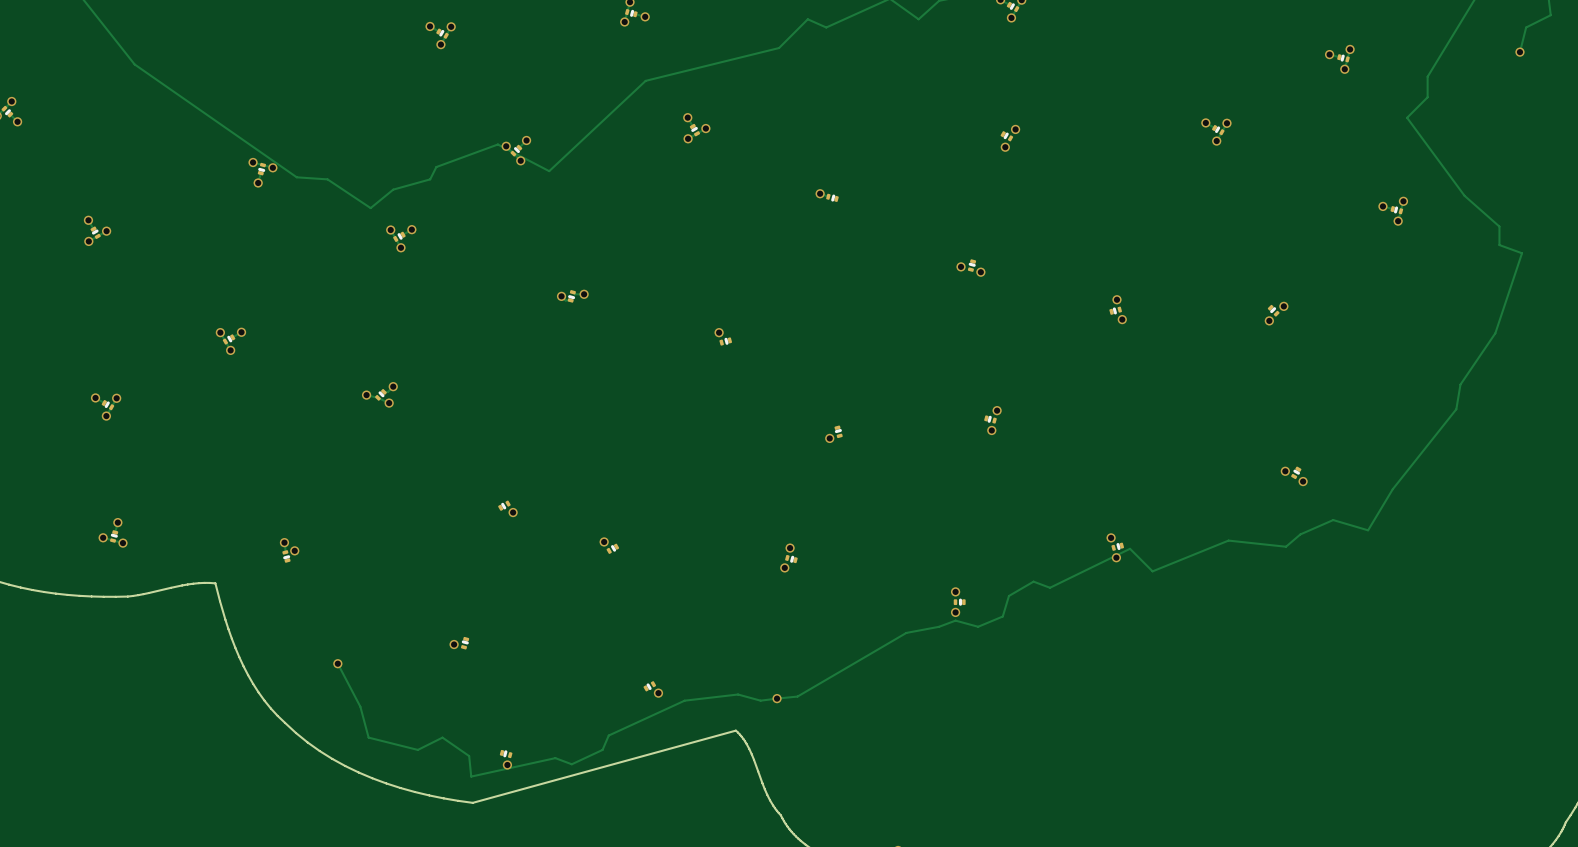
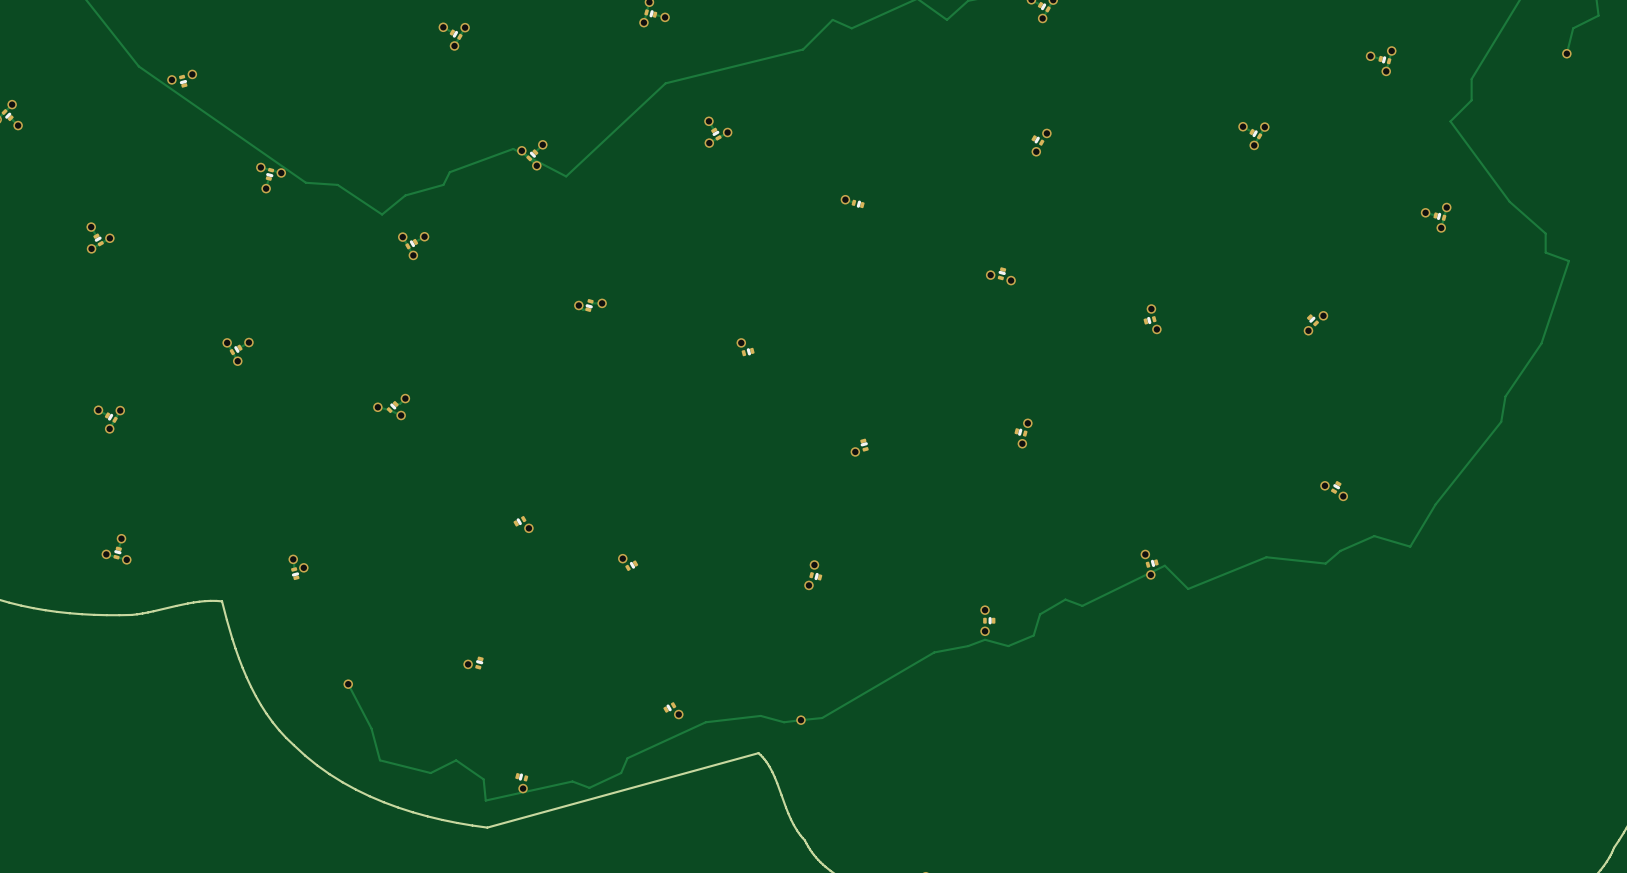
via: none -> (192, 74)
via: none -> (171, 79)
part: none -> (183, 81)

